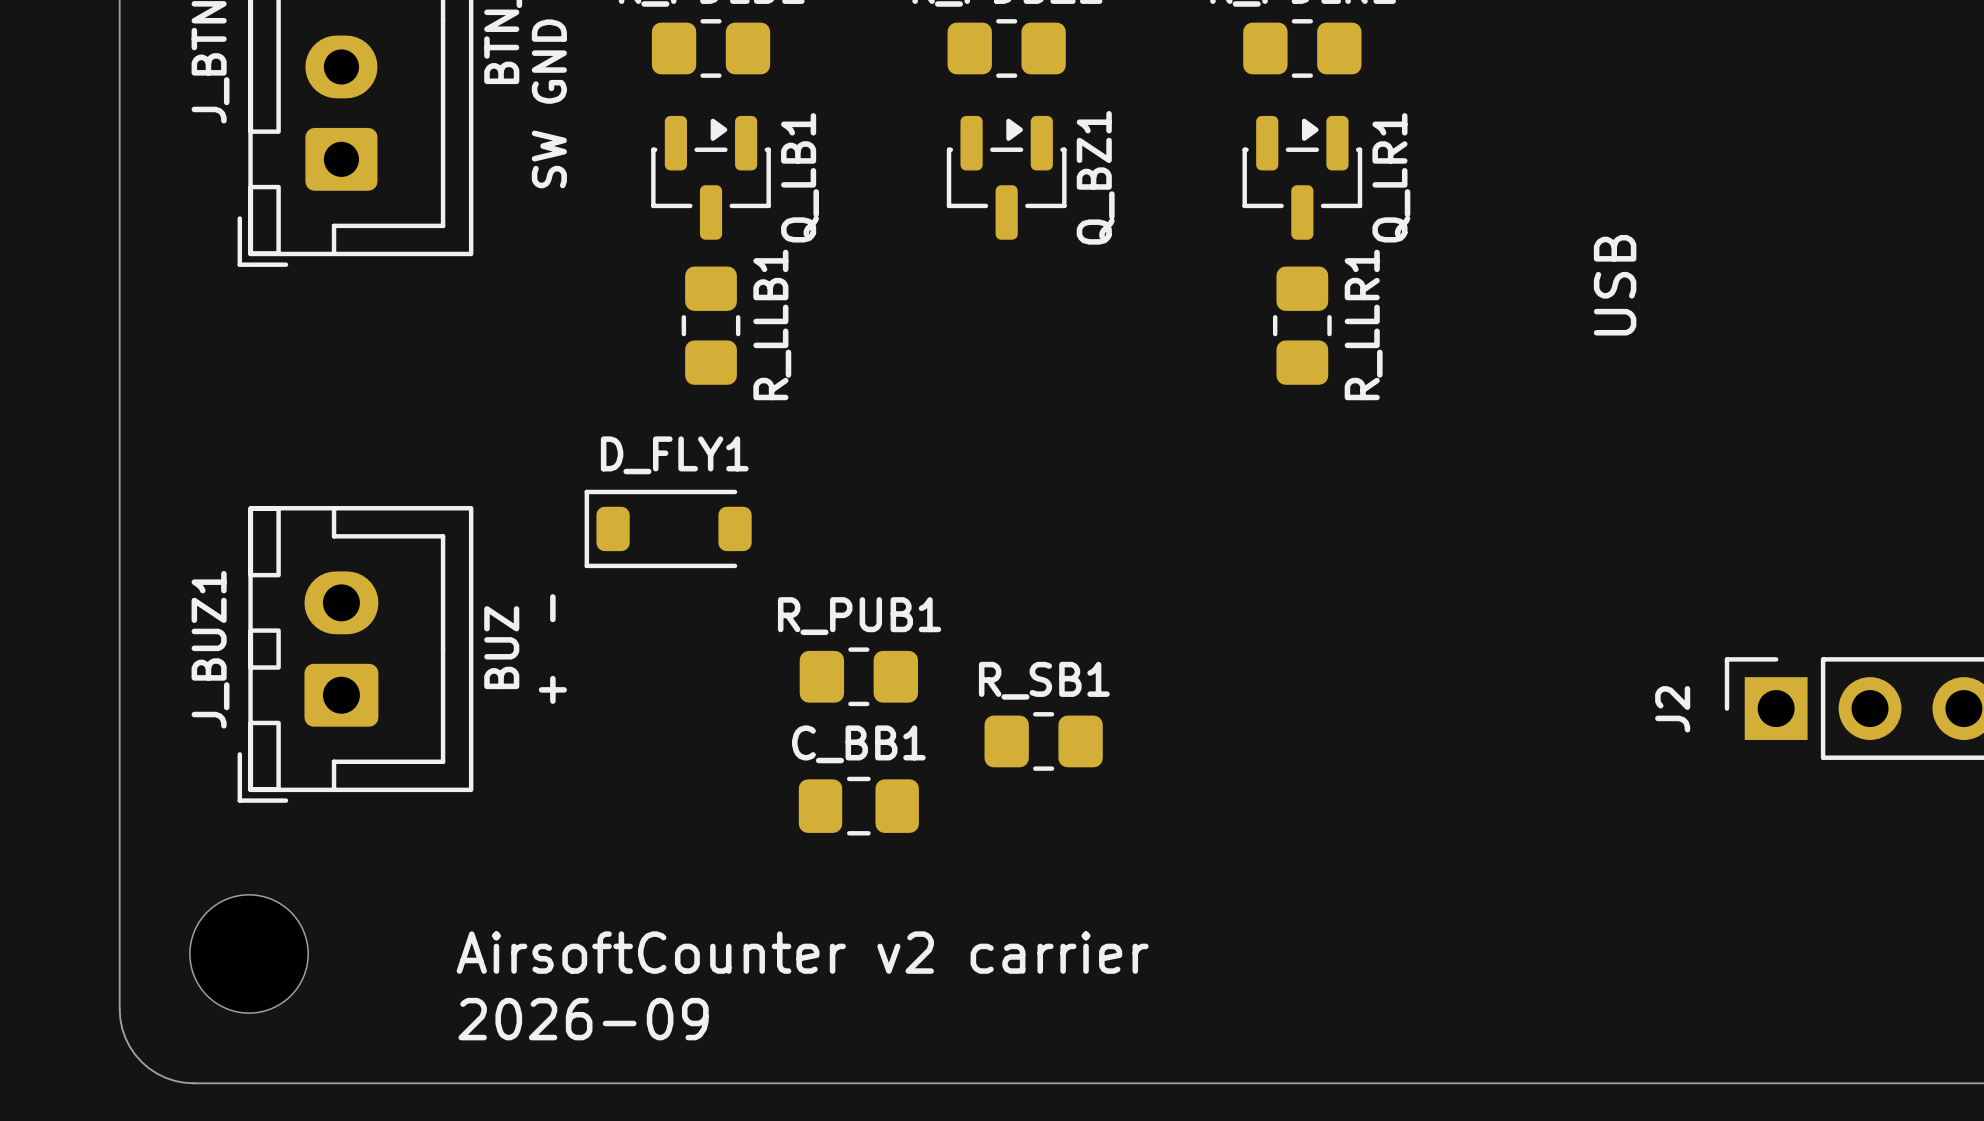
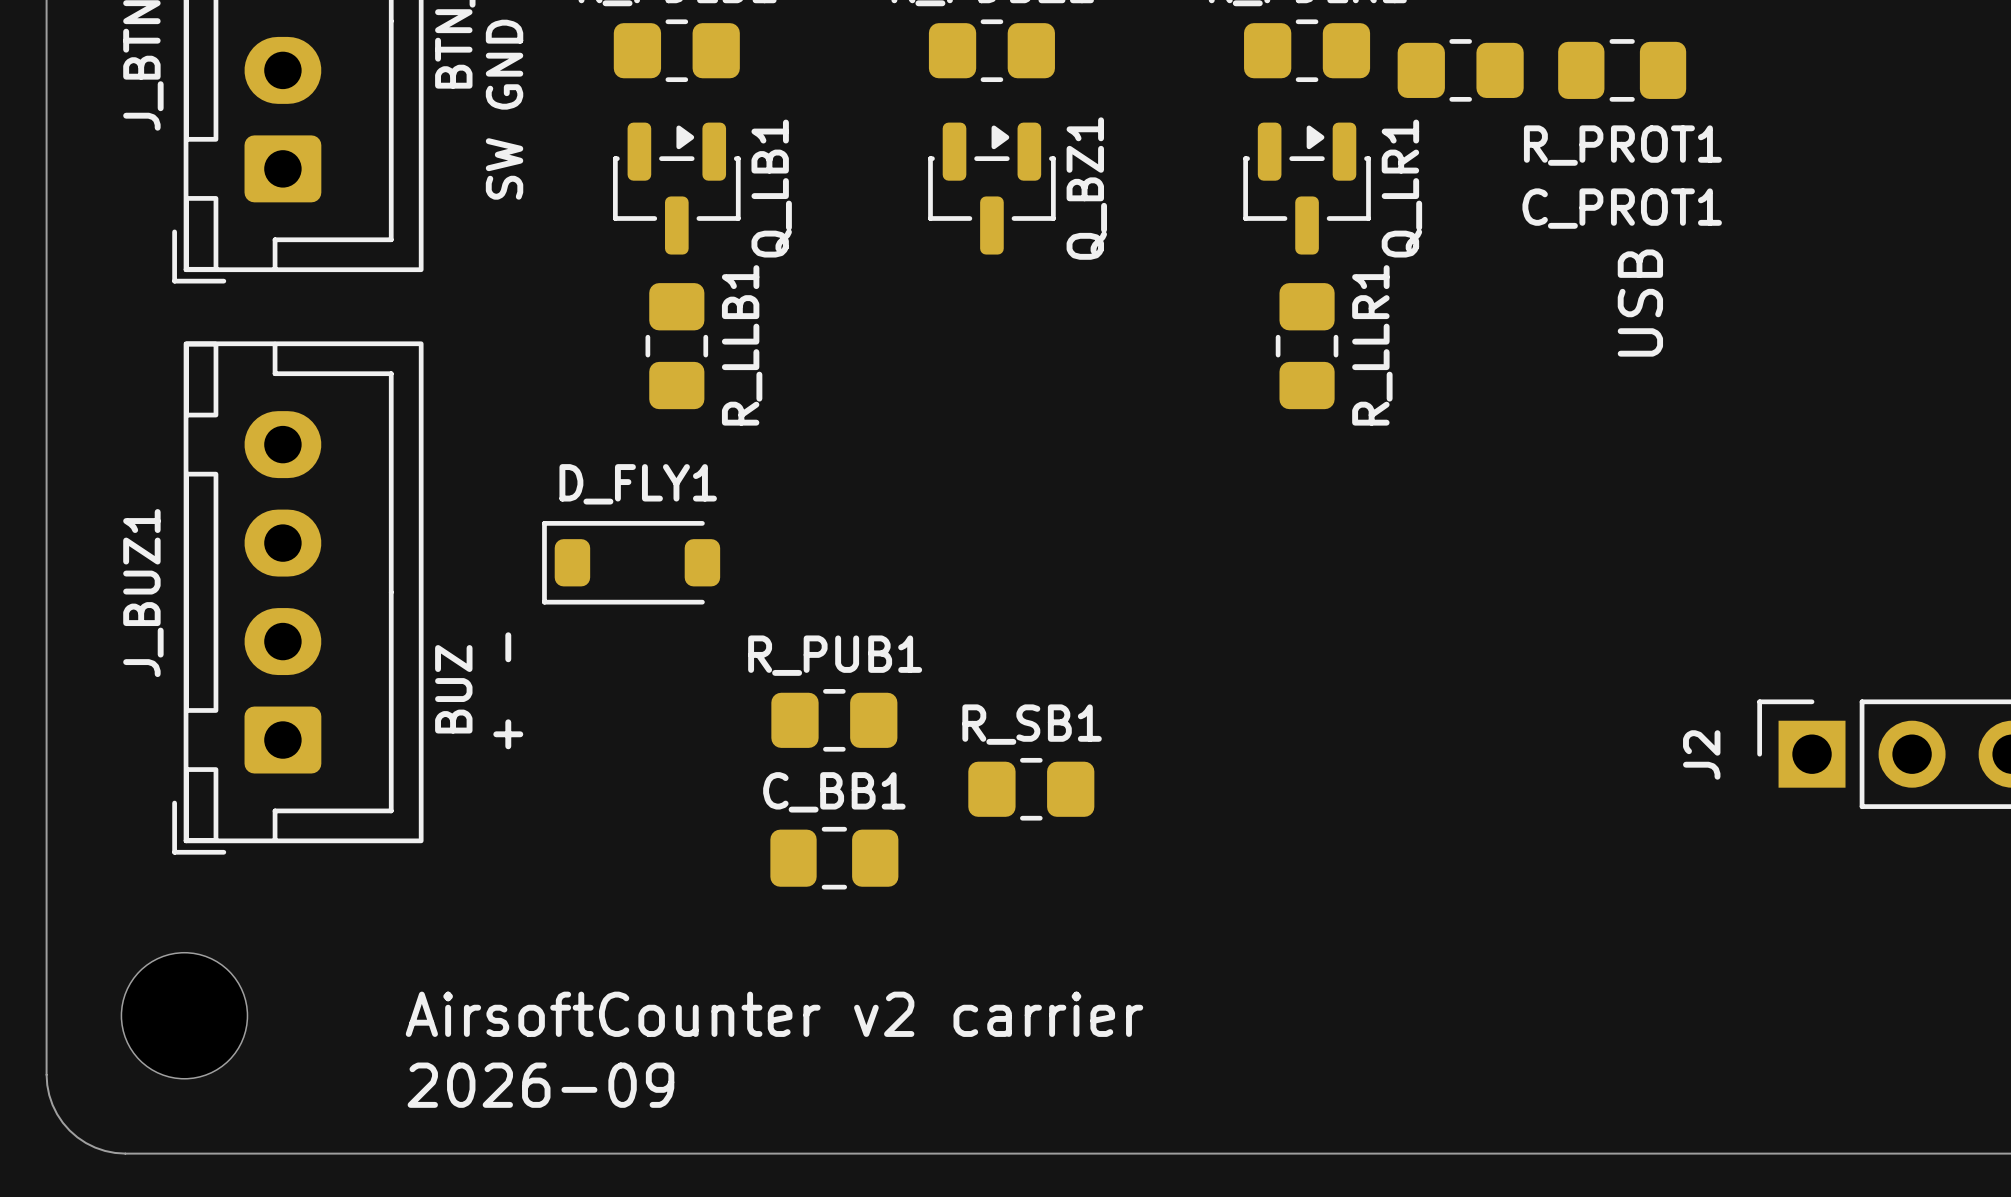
R_PROT1: none -> (1460, 70)
C_PROT1: none -> (1622, 70)
J_BUZ1 footprint: [237, 506, 474, 803] -> [172, 341, 424, 855]

